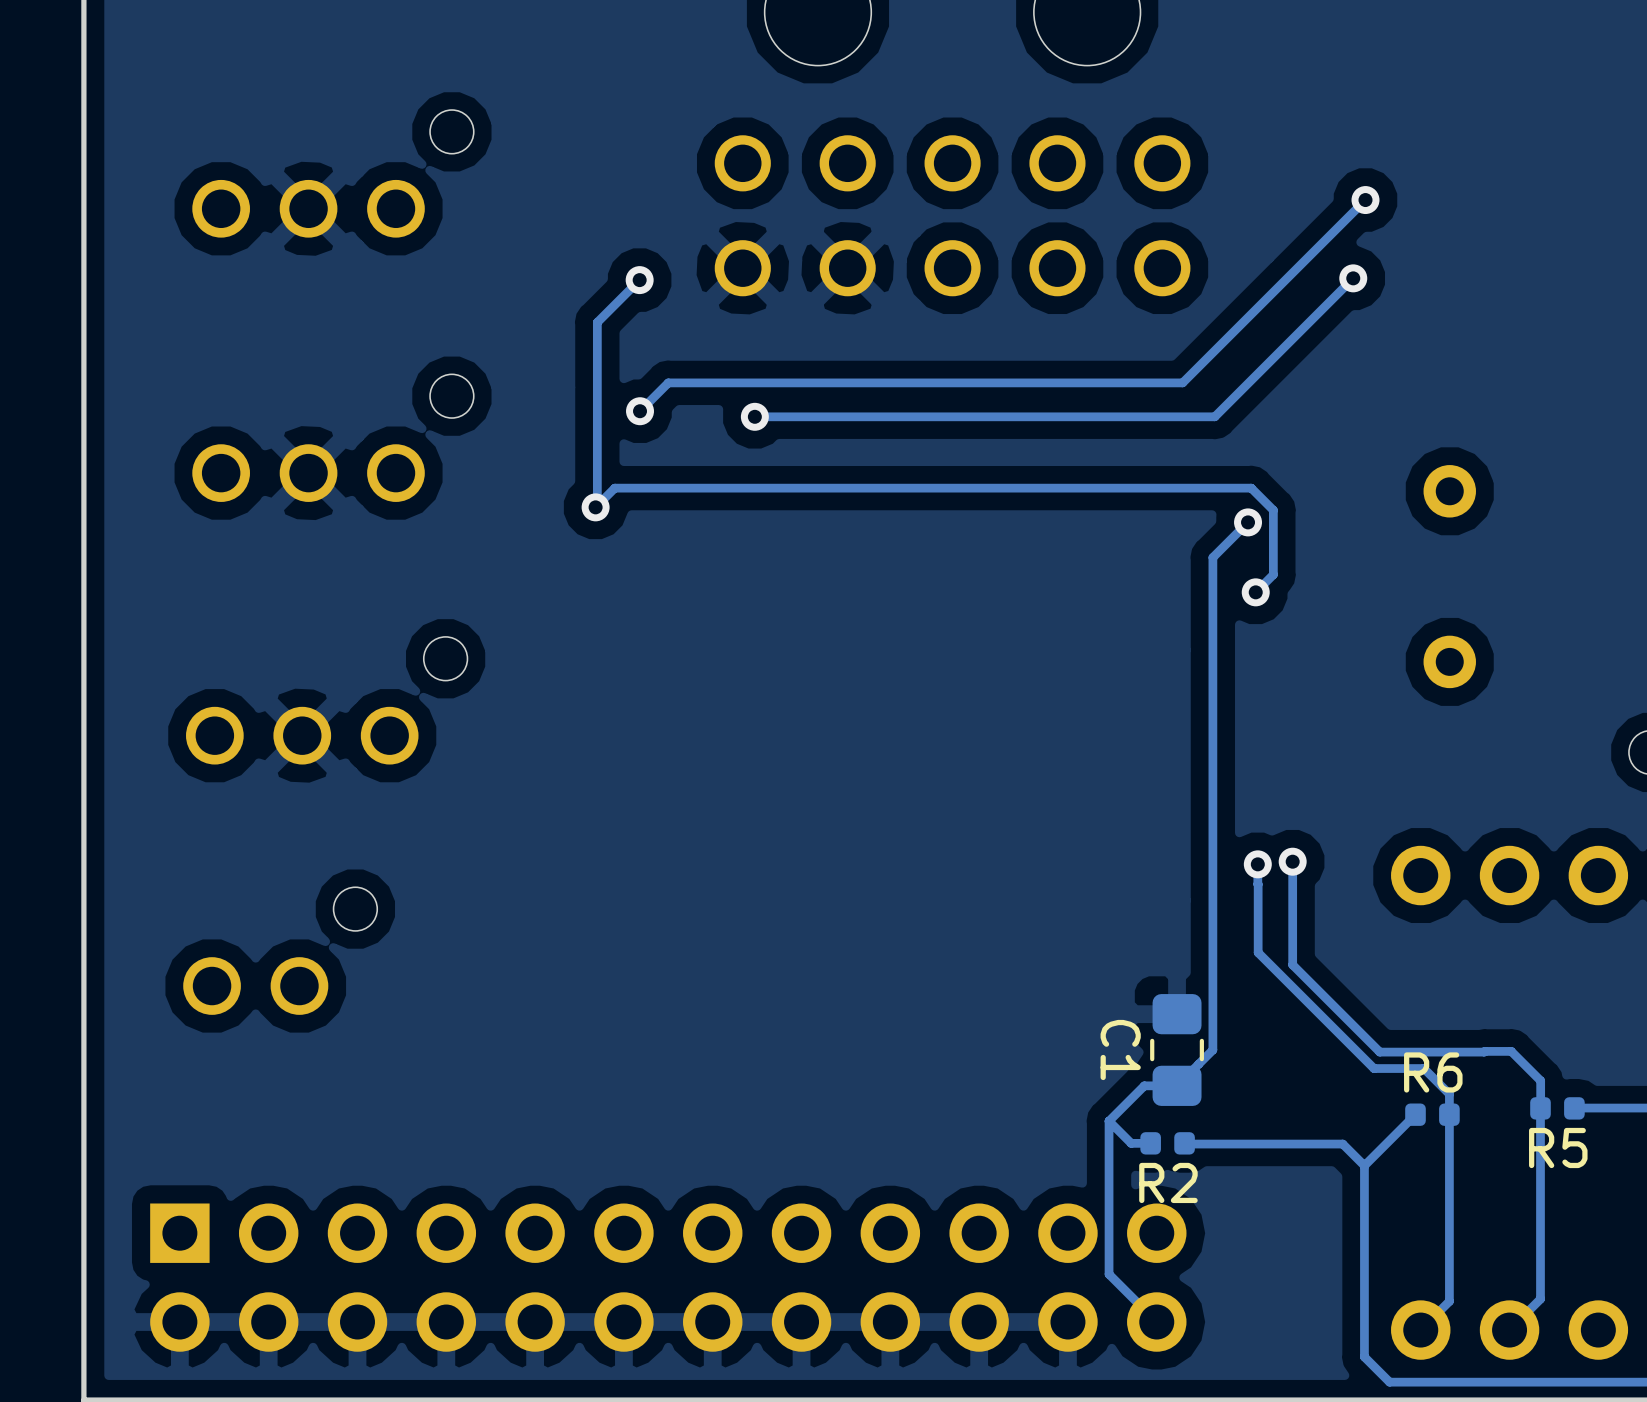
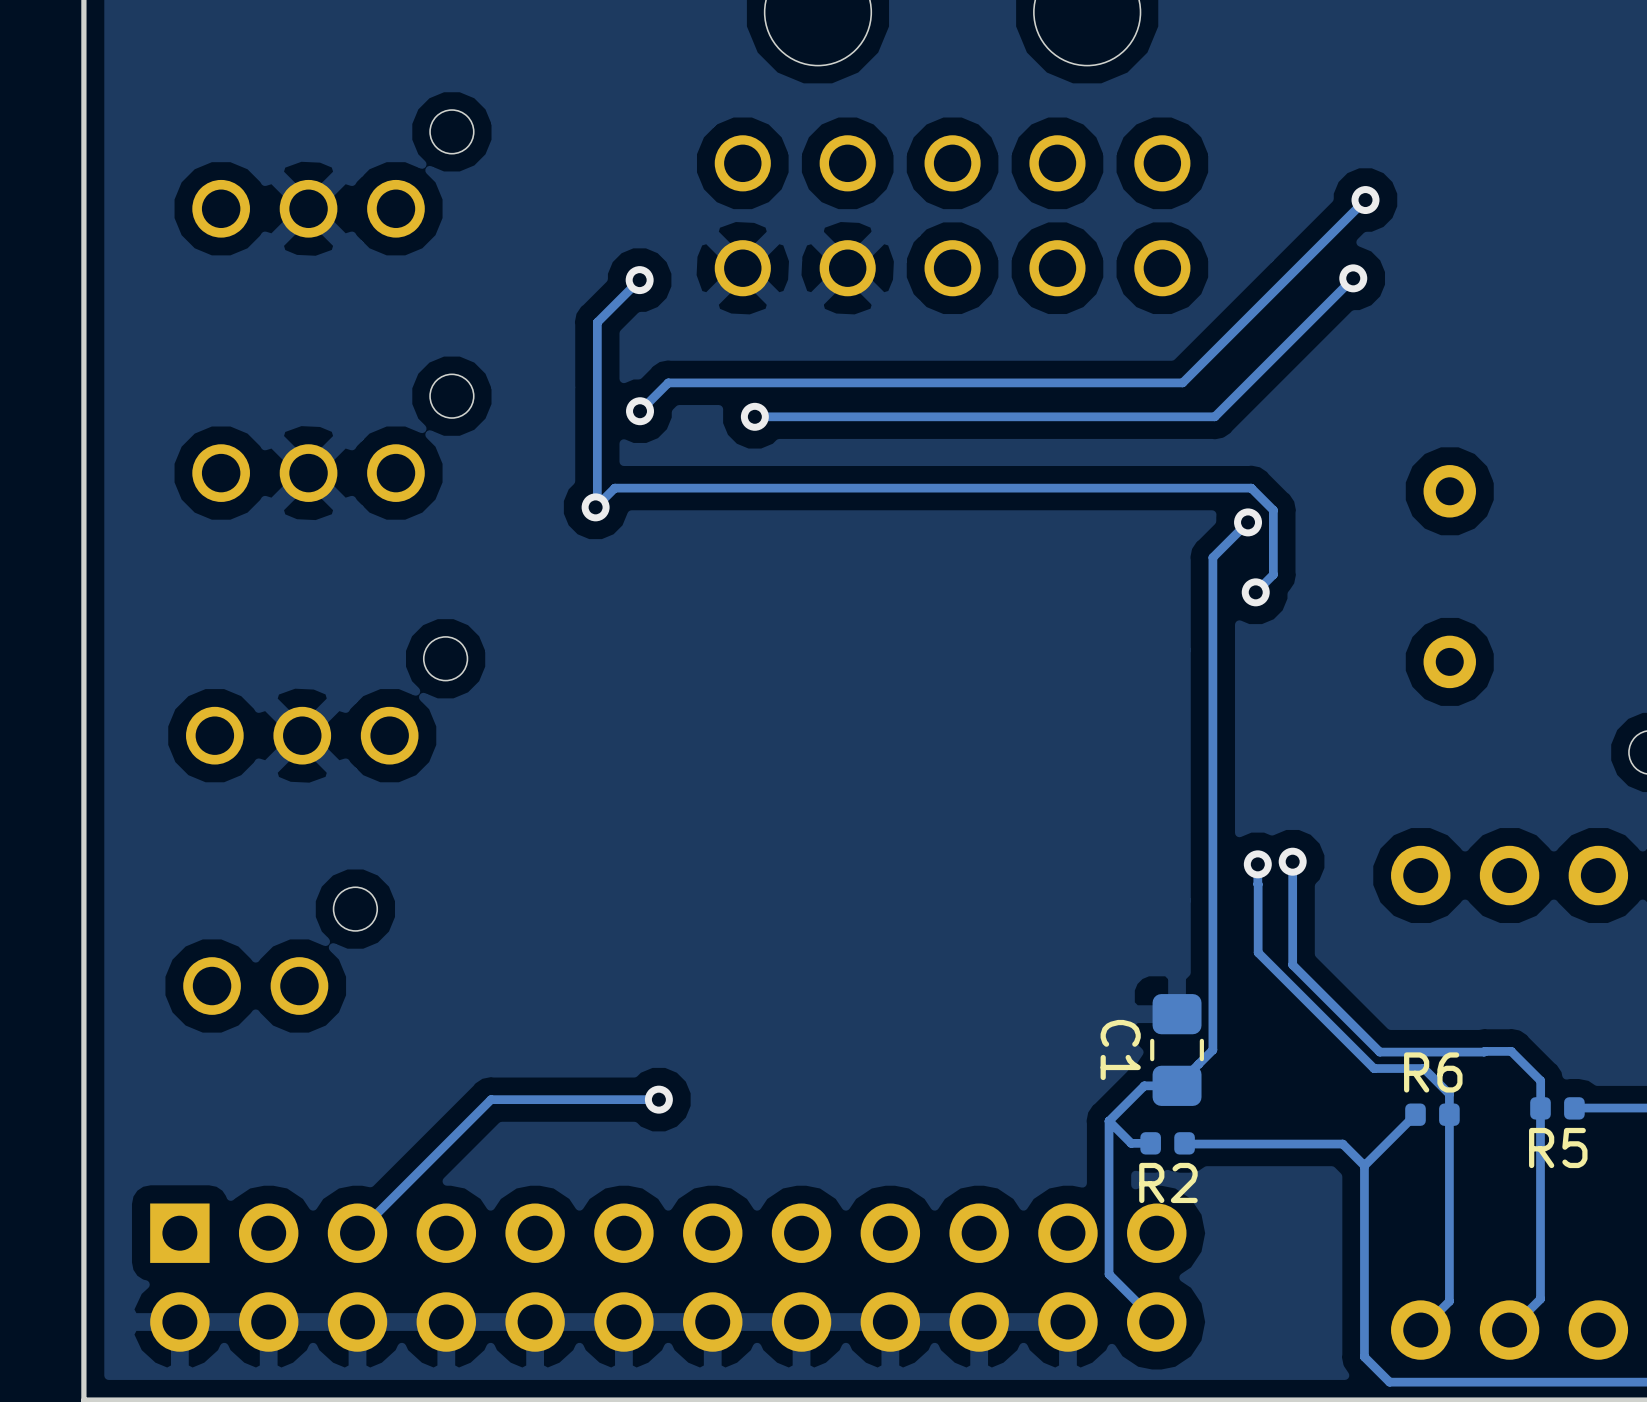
track: none -> (658, 1099) (491, 1099) (357, 1233)
via: none -> (658, 1099)

